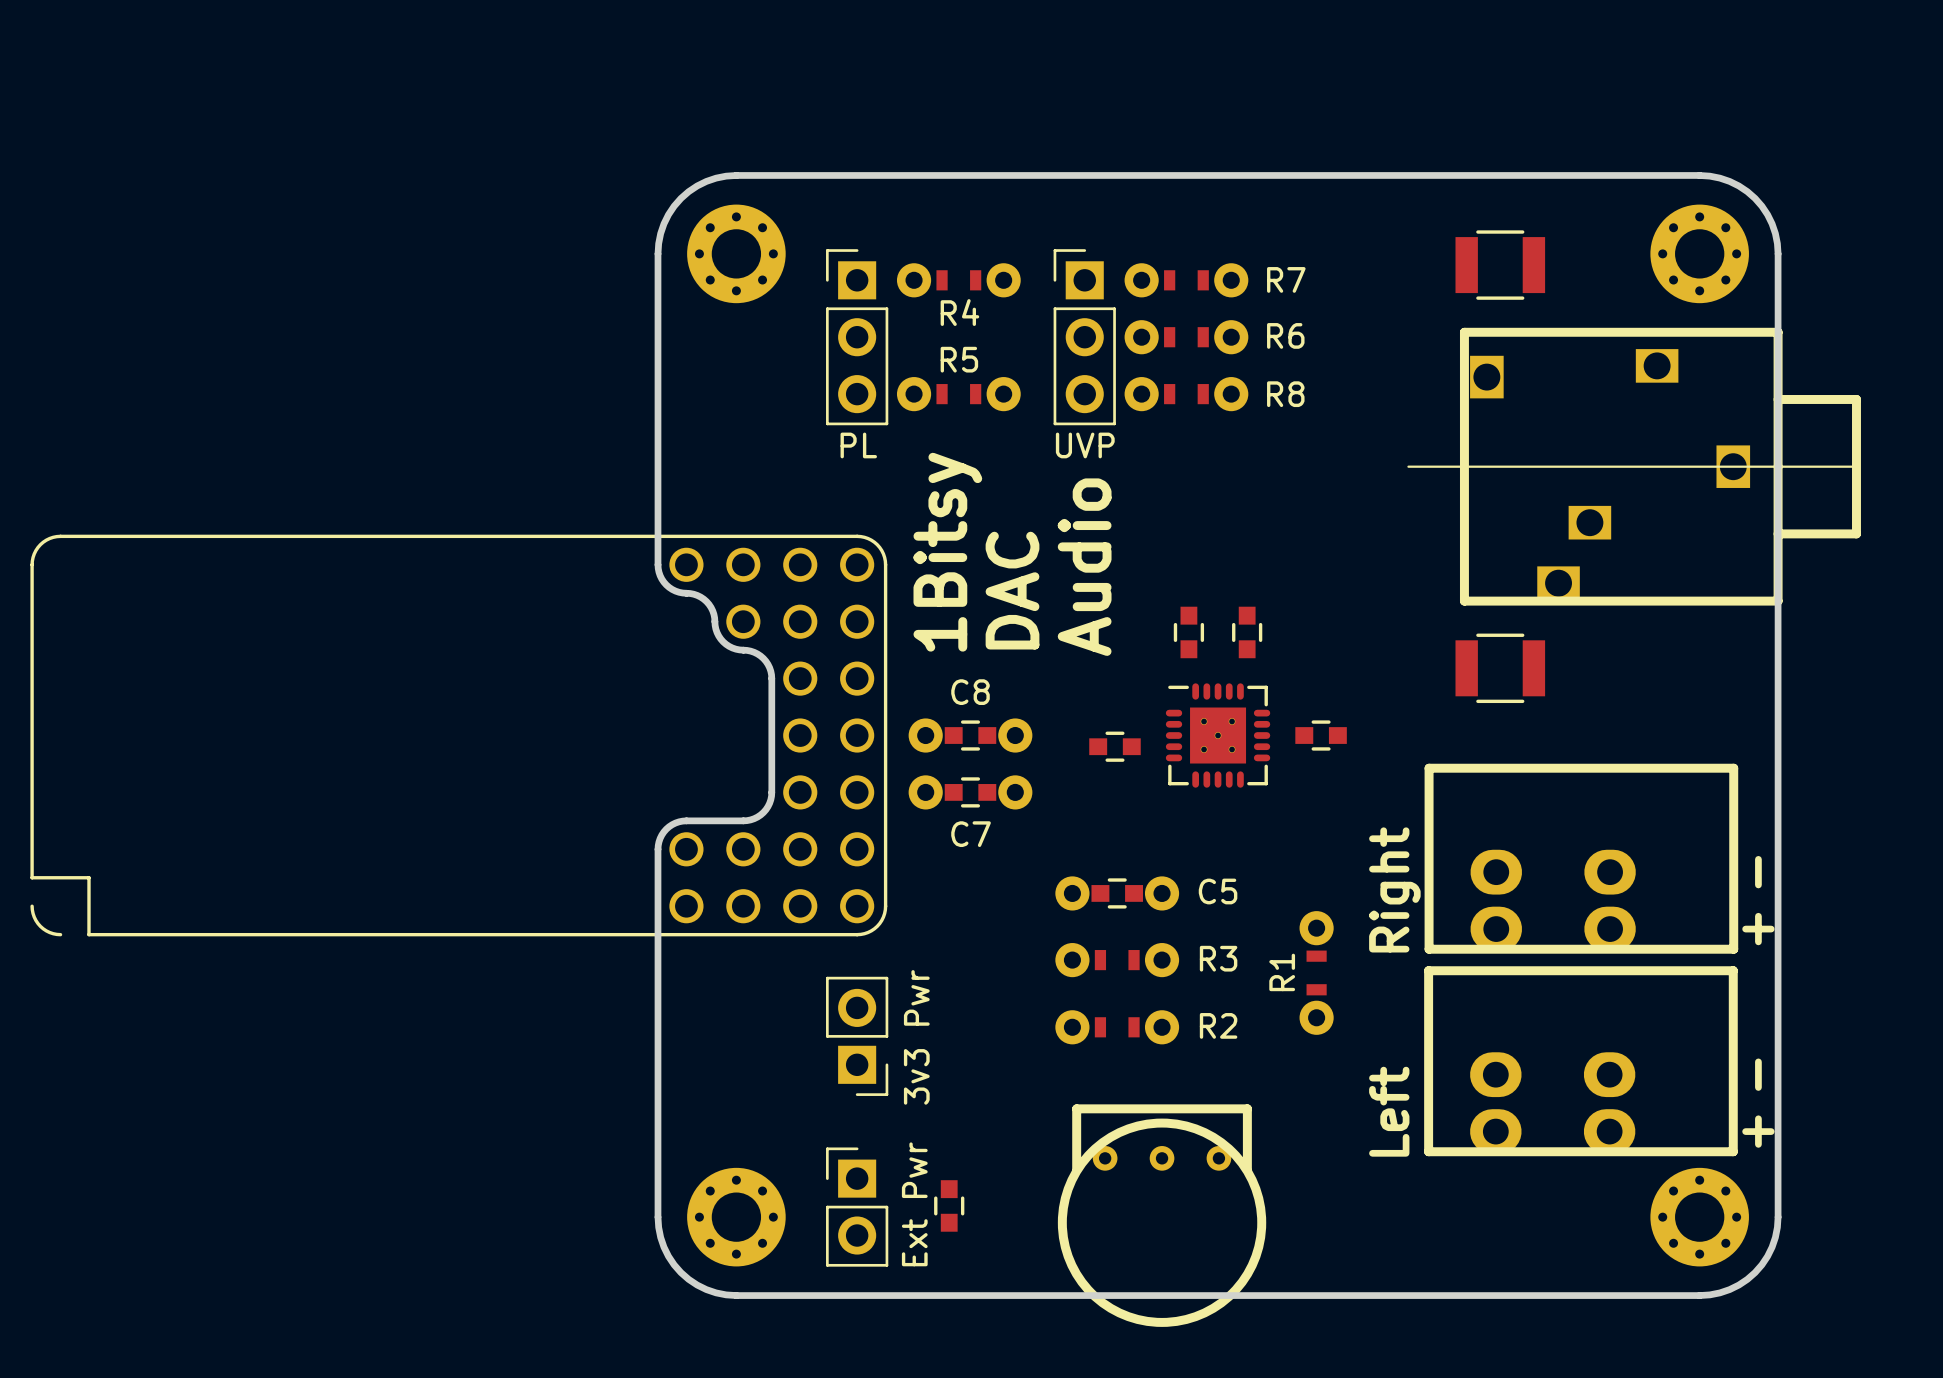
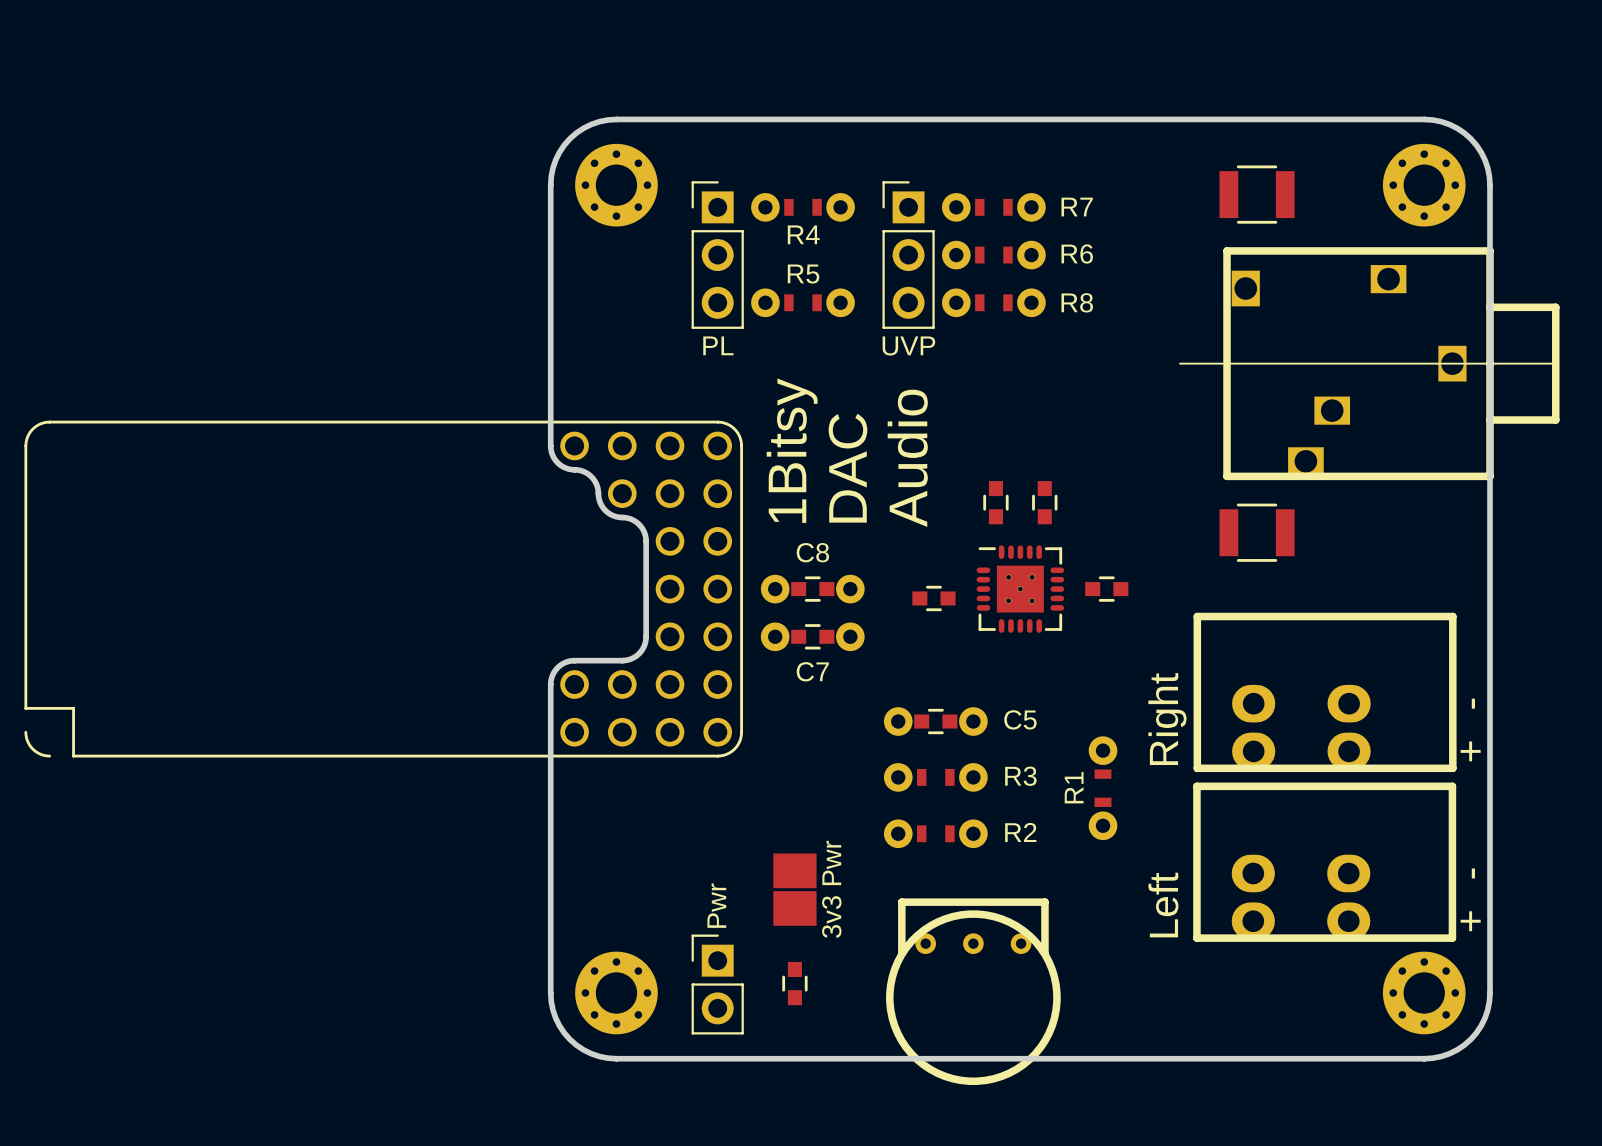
3v3 Pwr footprint: [826, 976, 889, 1096] -> [773, 853, 817, 926]
Ext Pwr name: Ext Pwr (914, 1204) -> Pwr (716, 905)

